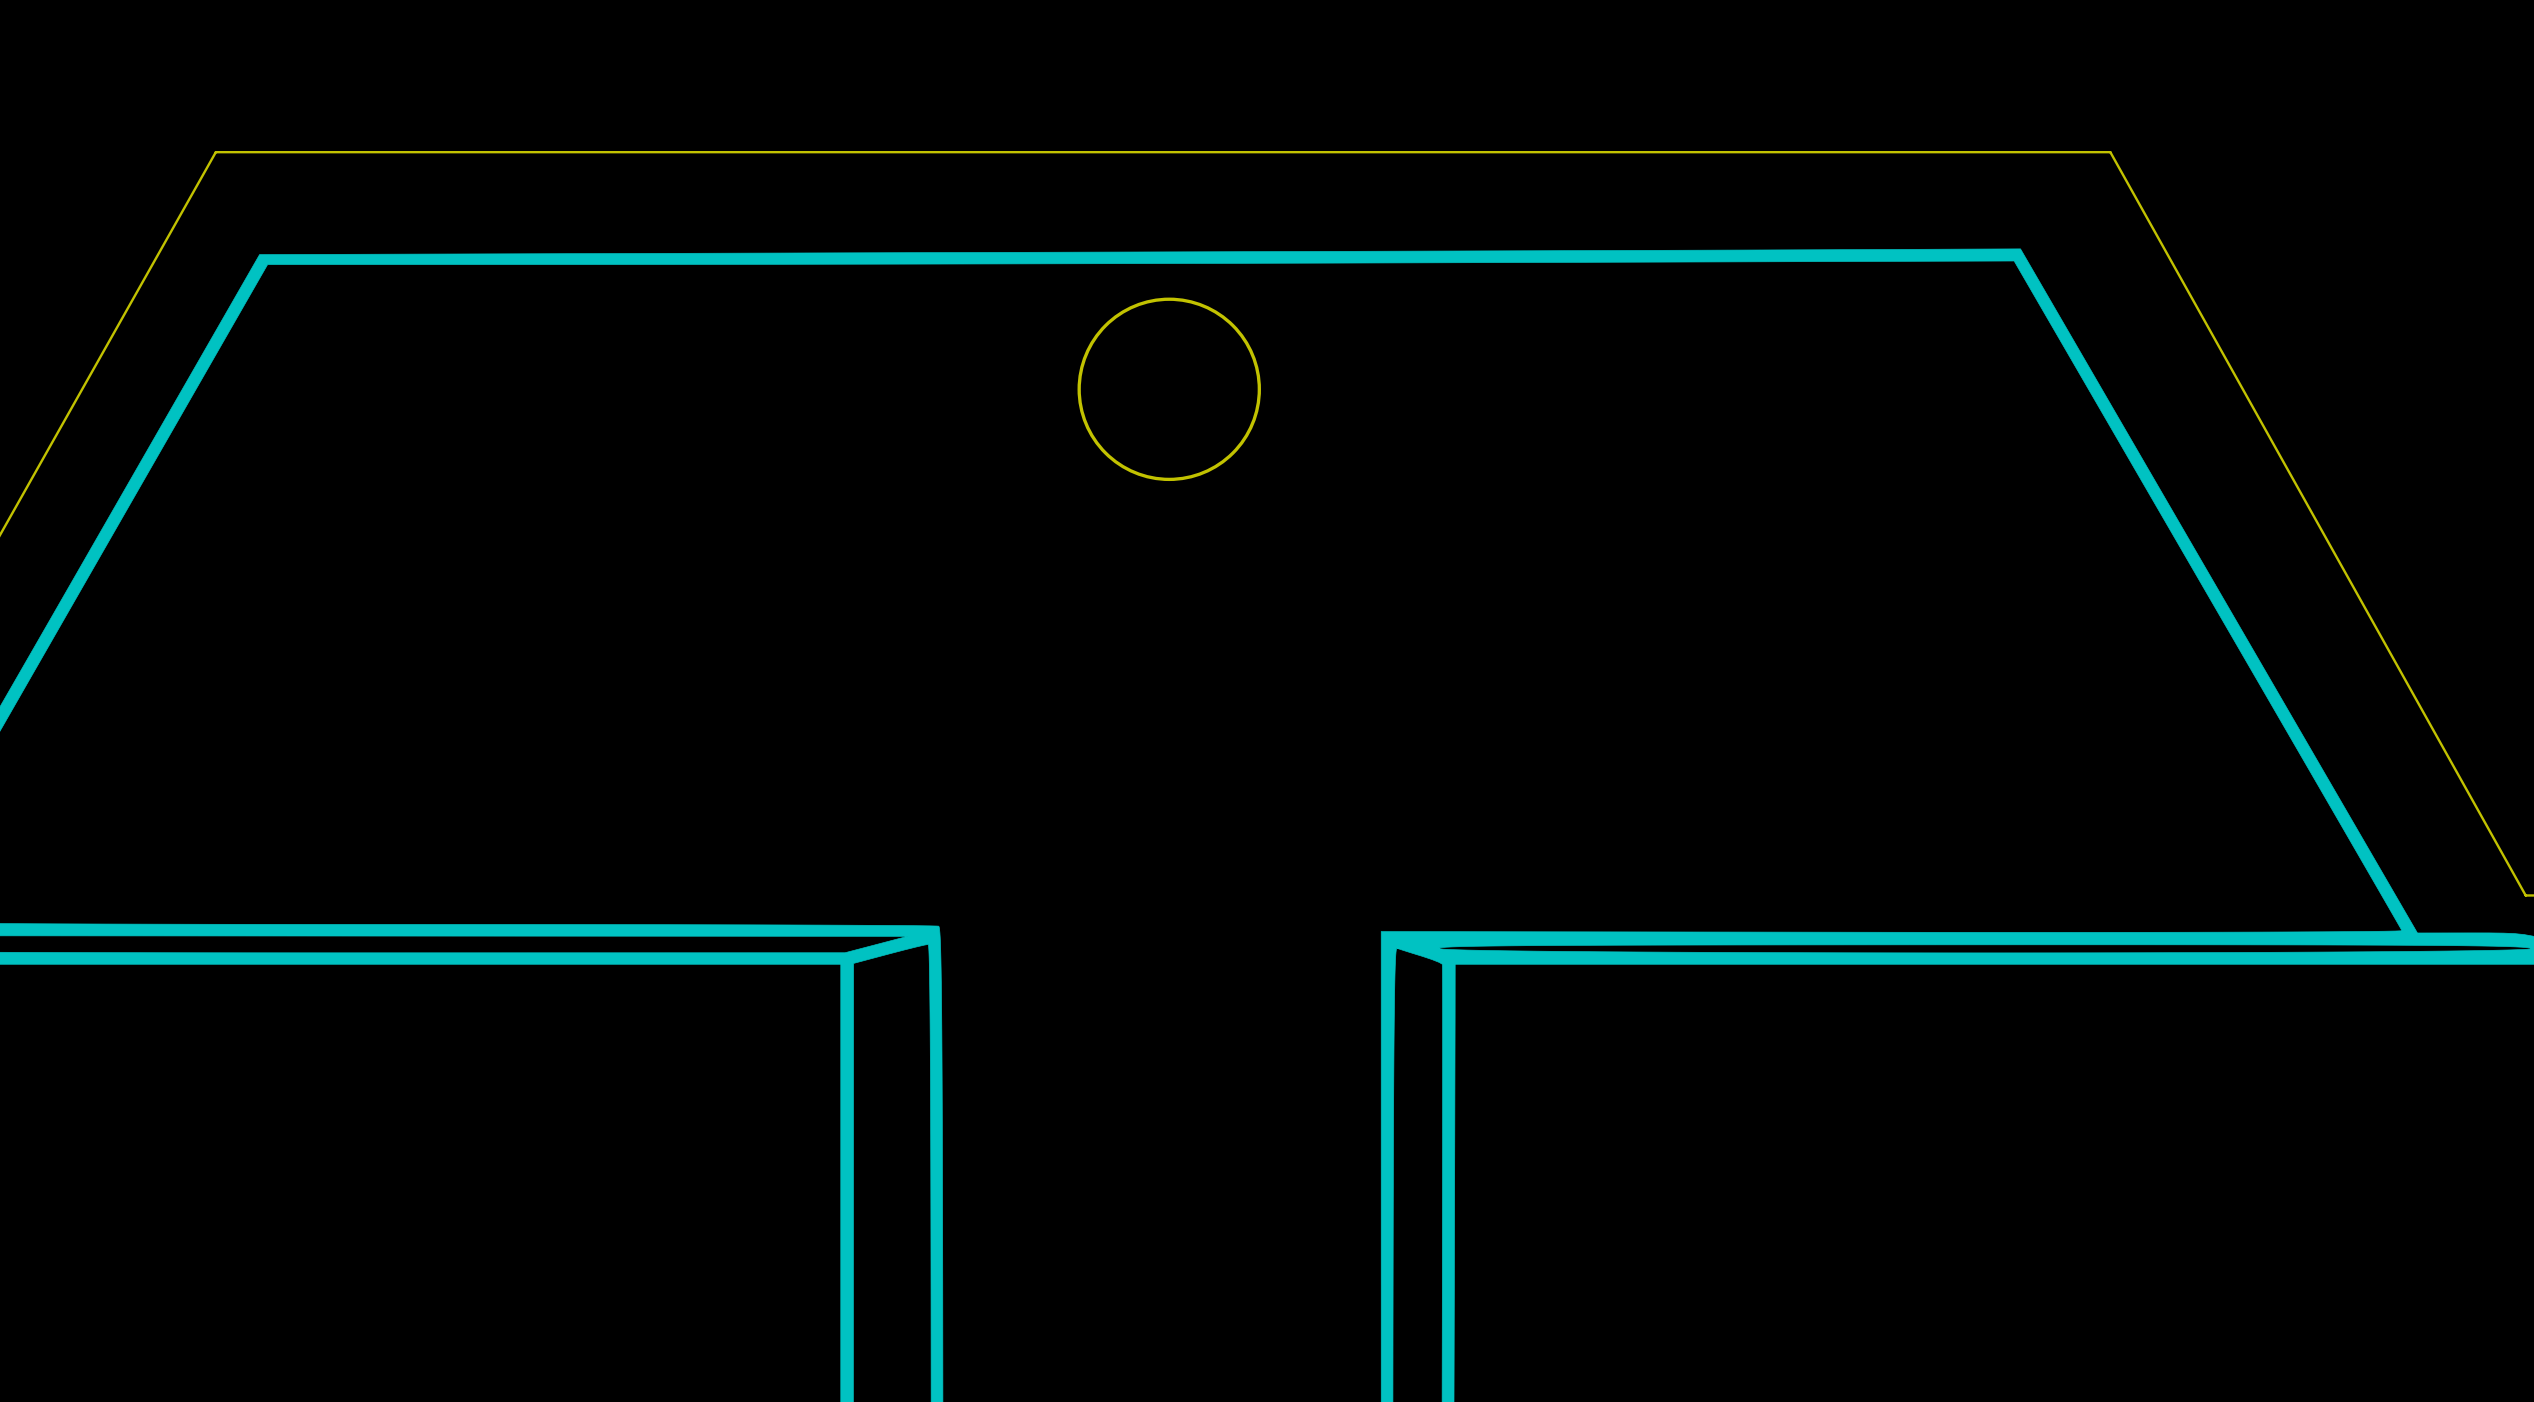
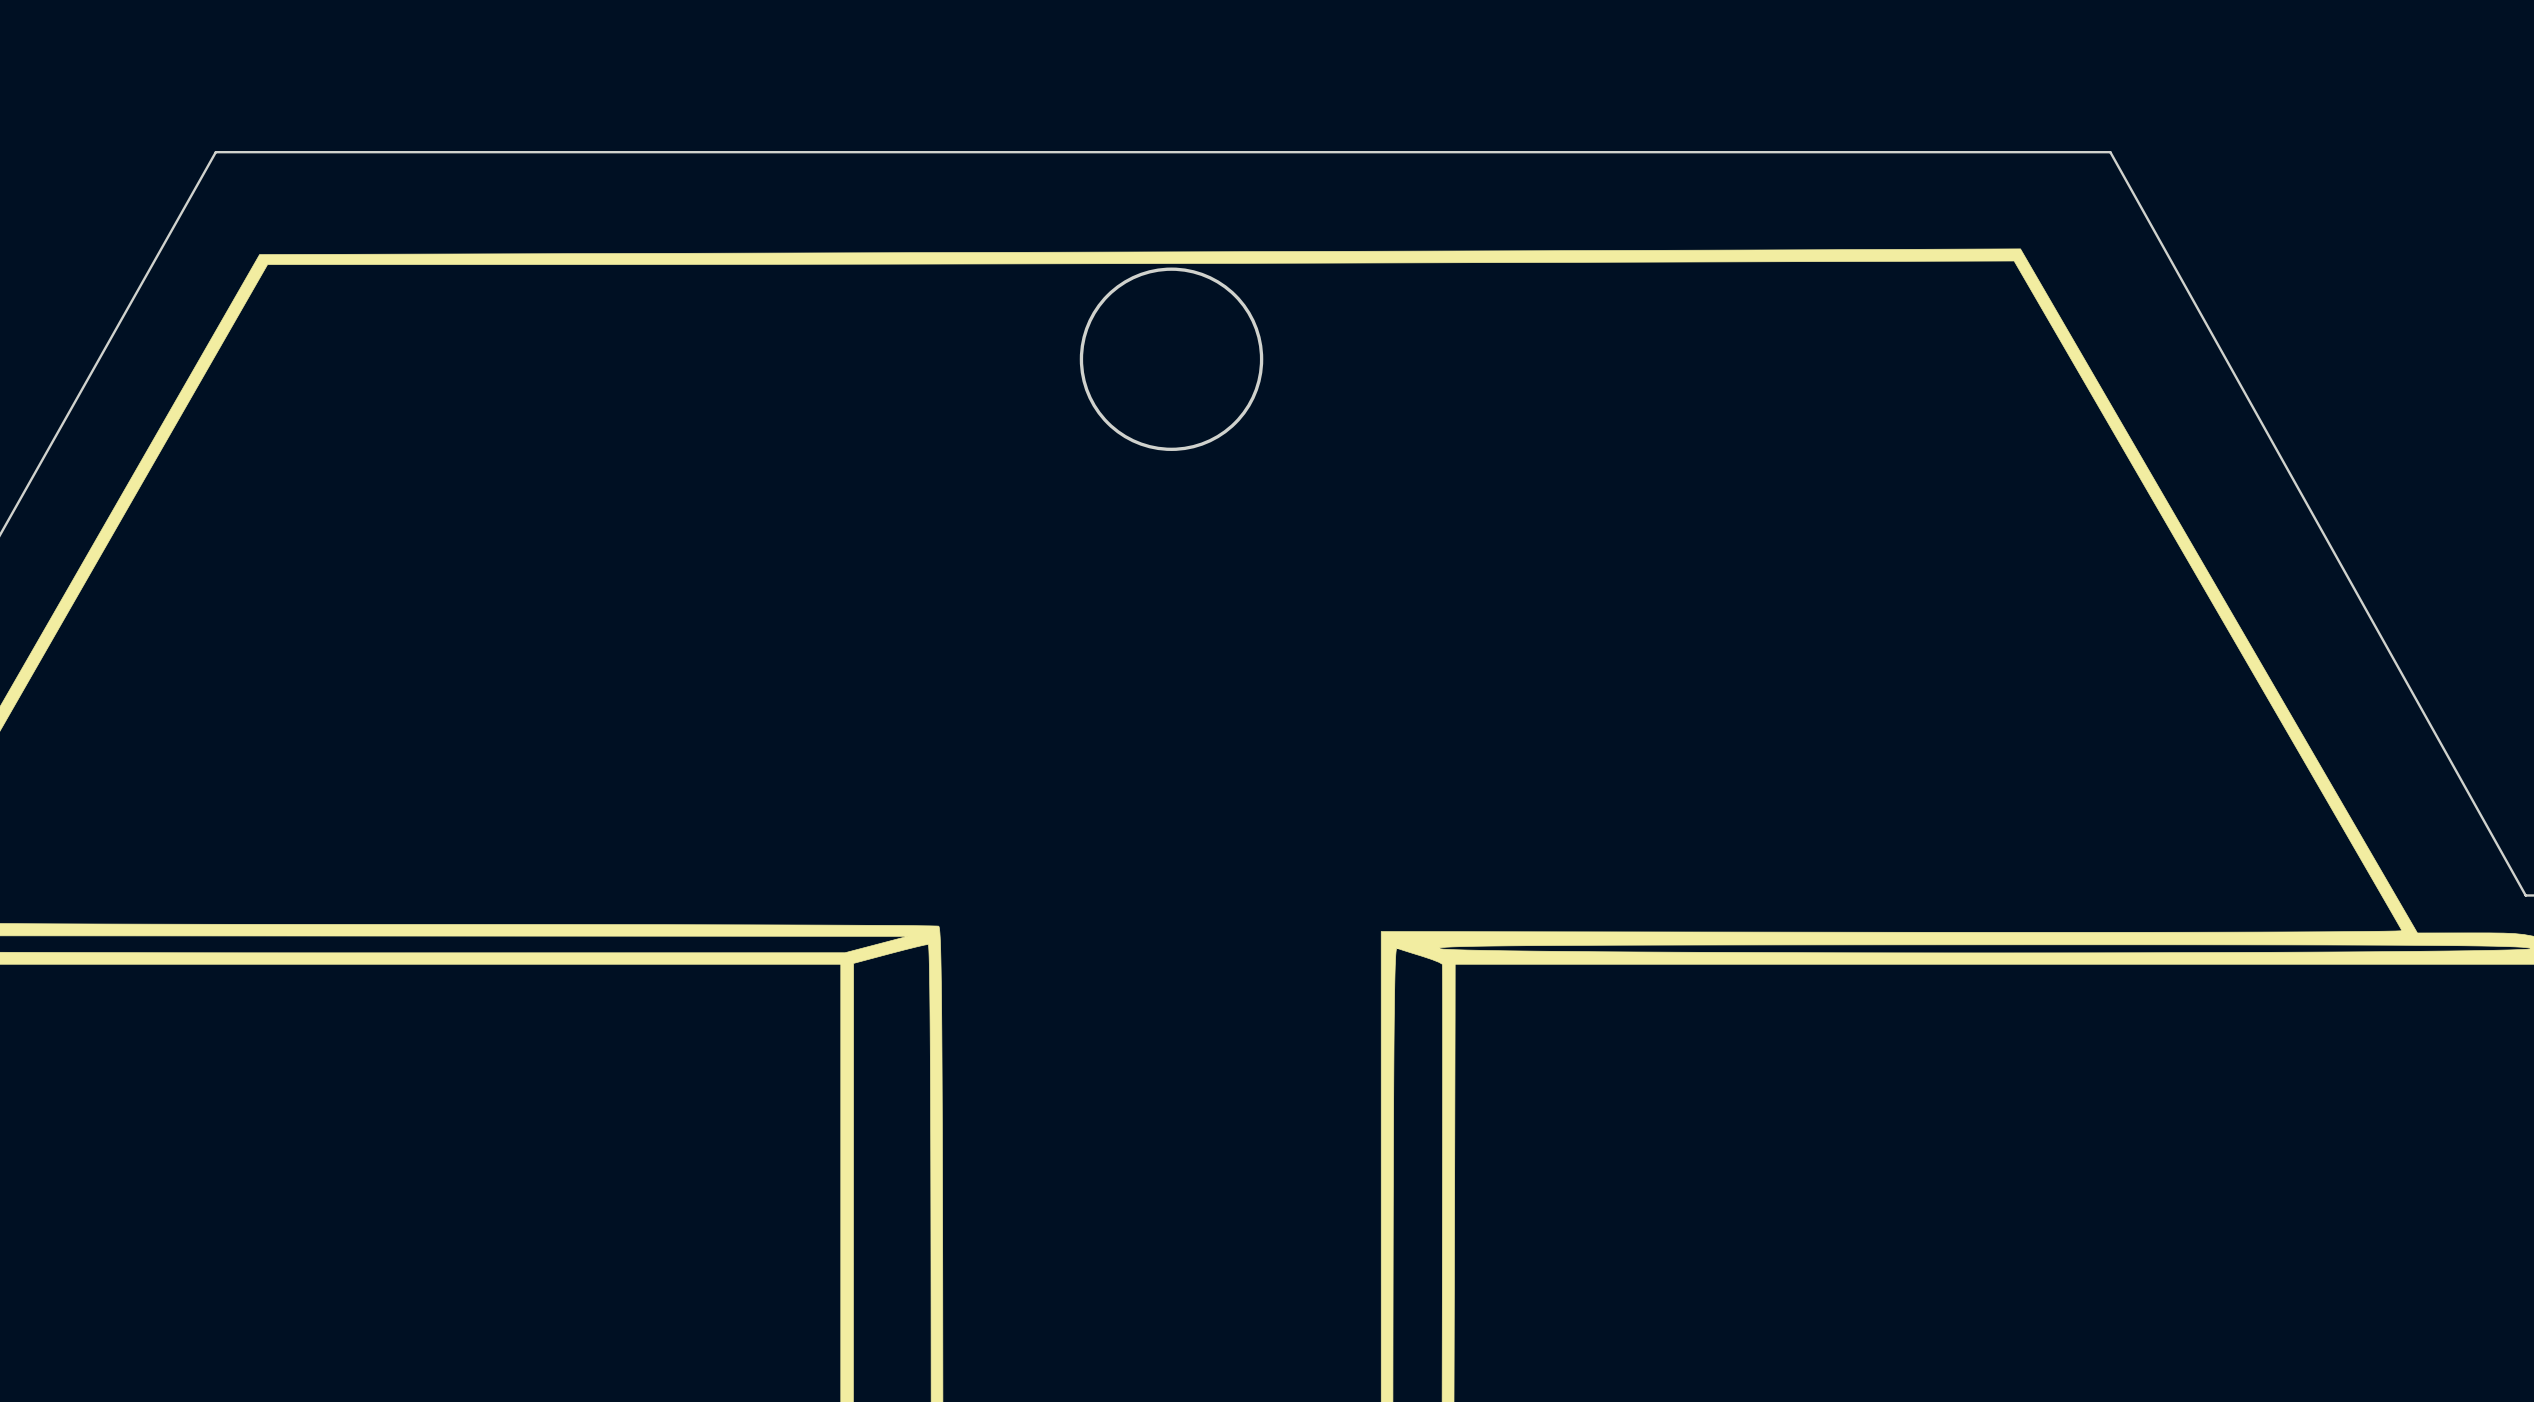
round board edge position: (1169, 389) -> (1171, 359)

